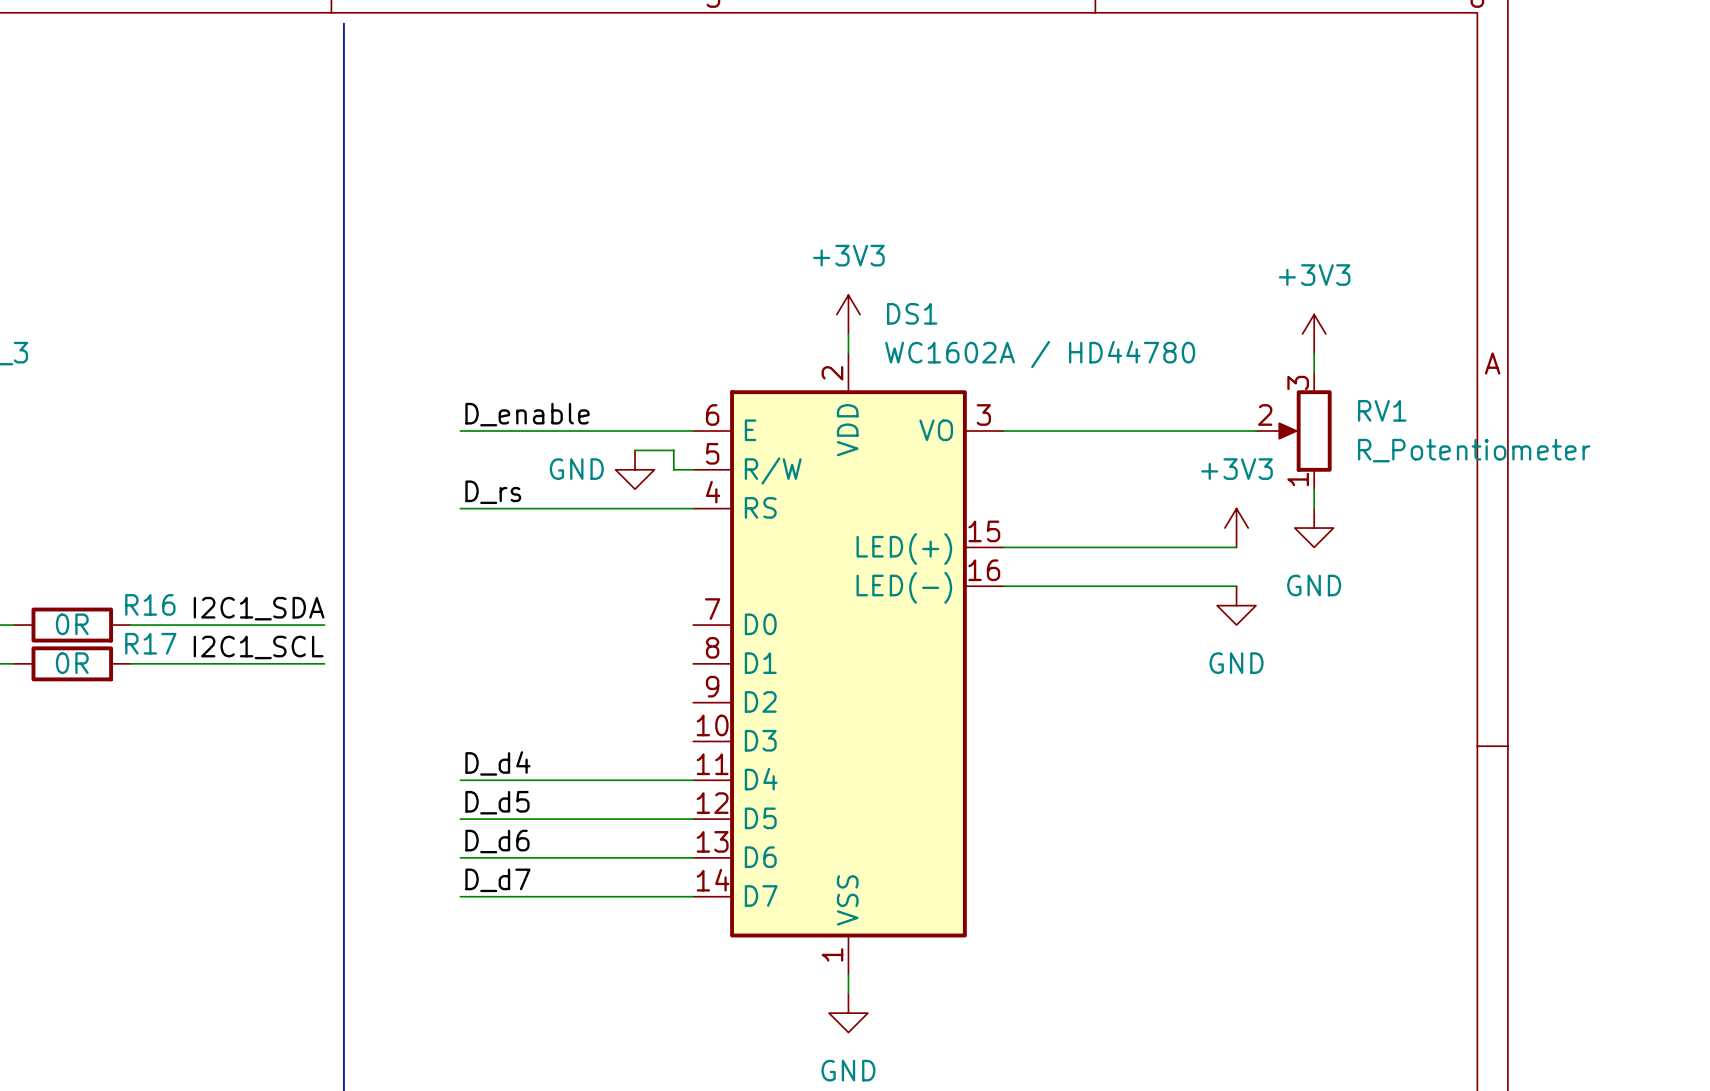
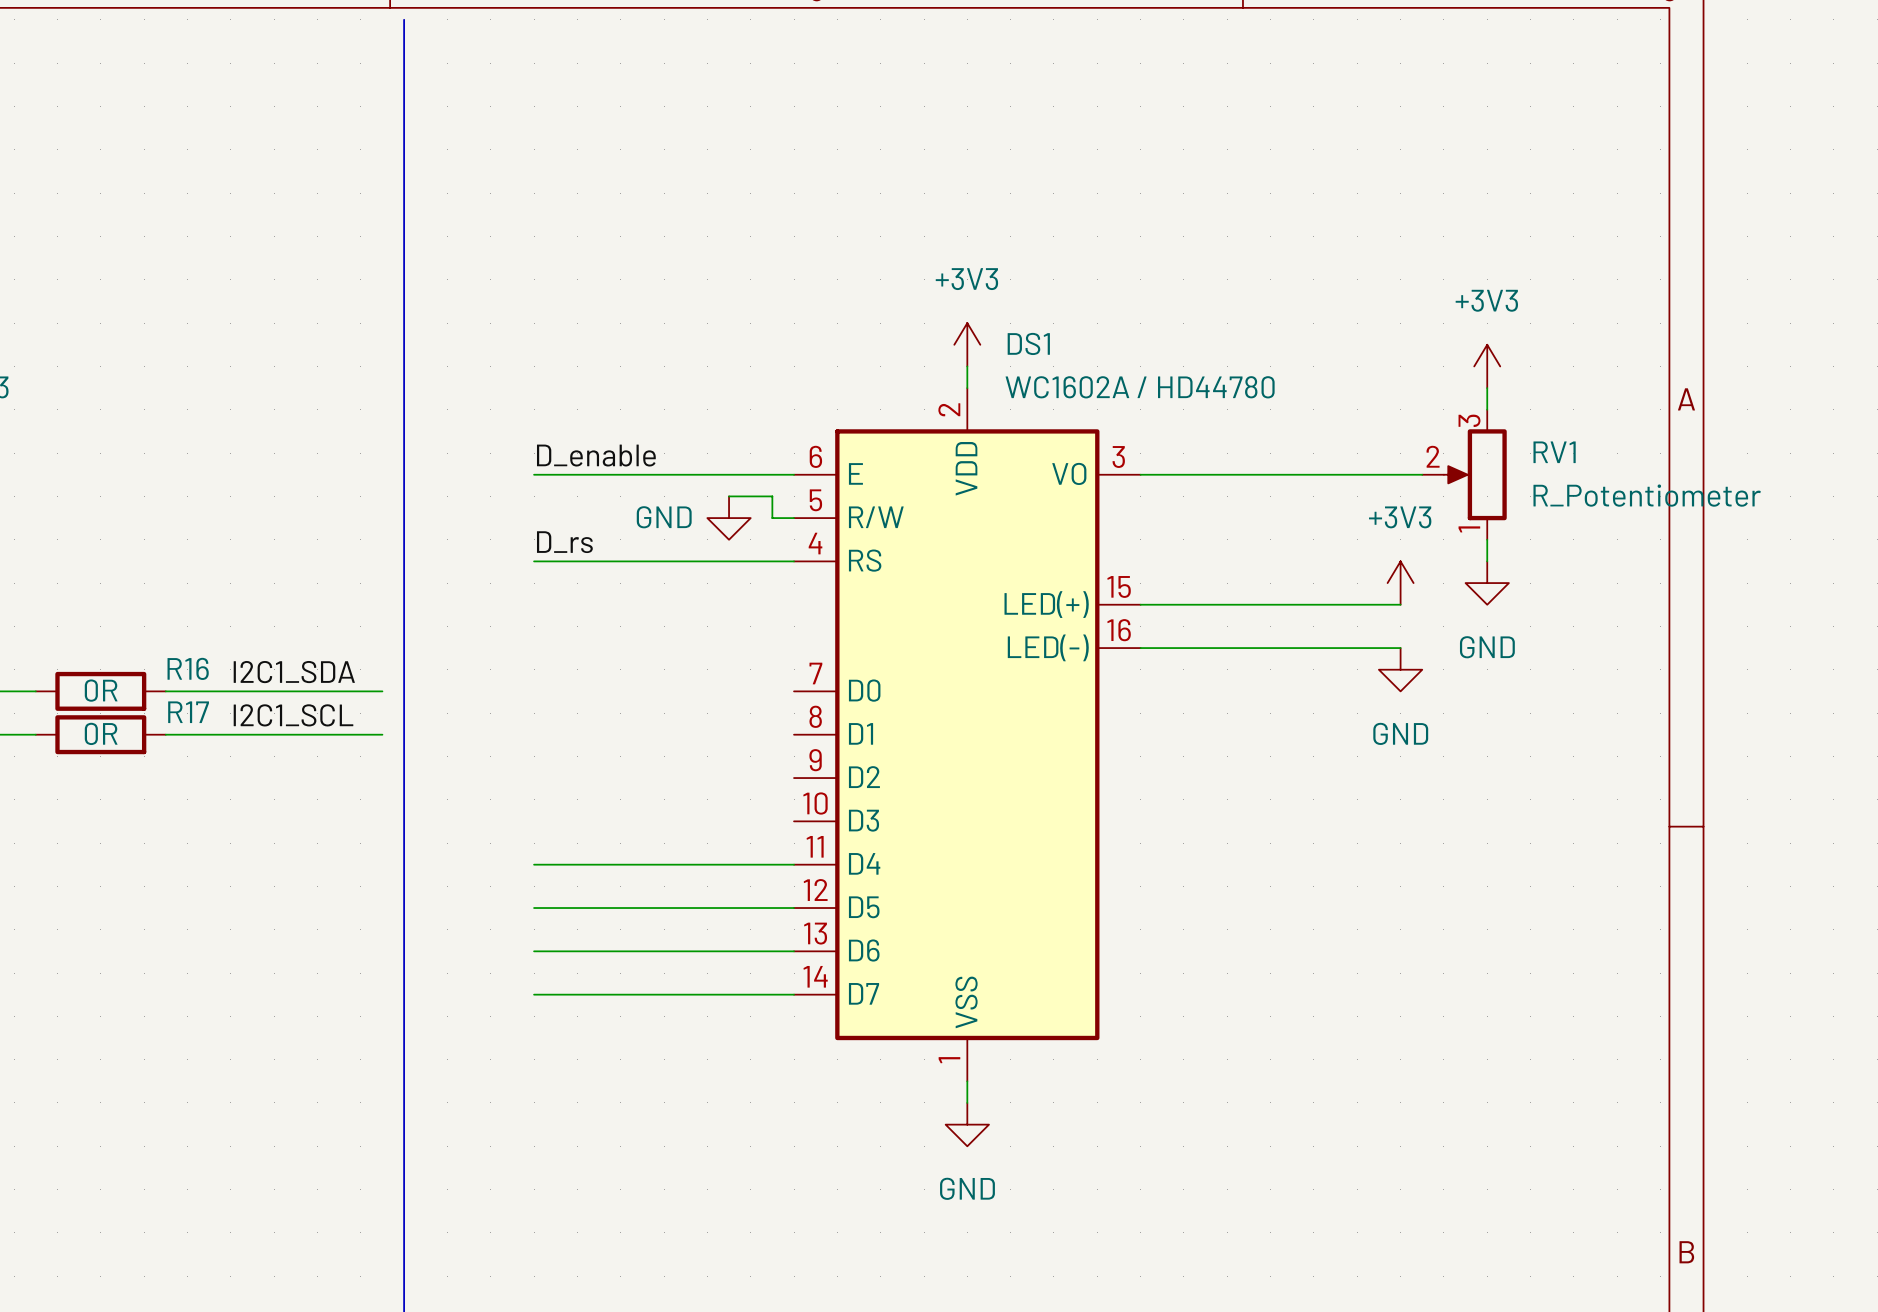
label: D_d4 (497, 763) -> none
label: D_d5 (497, 802) -> none
label: D_d6 (497, 841) -> none
label: D_d7 (497, 880) -> none

